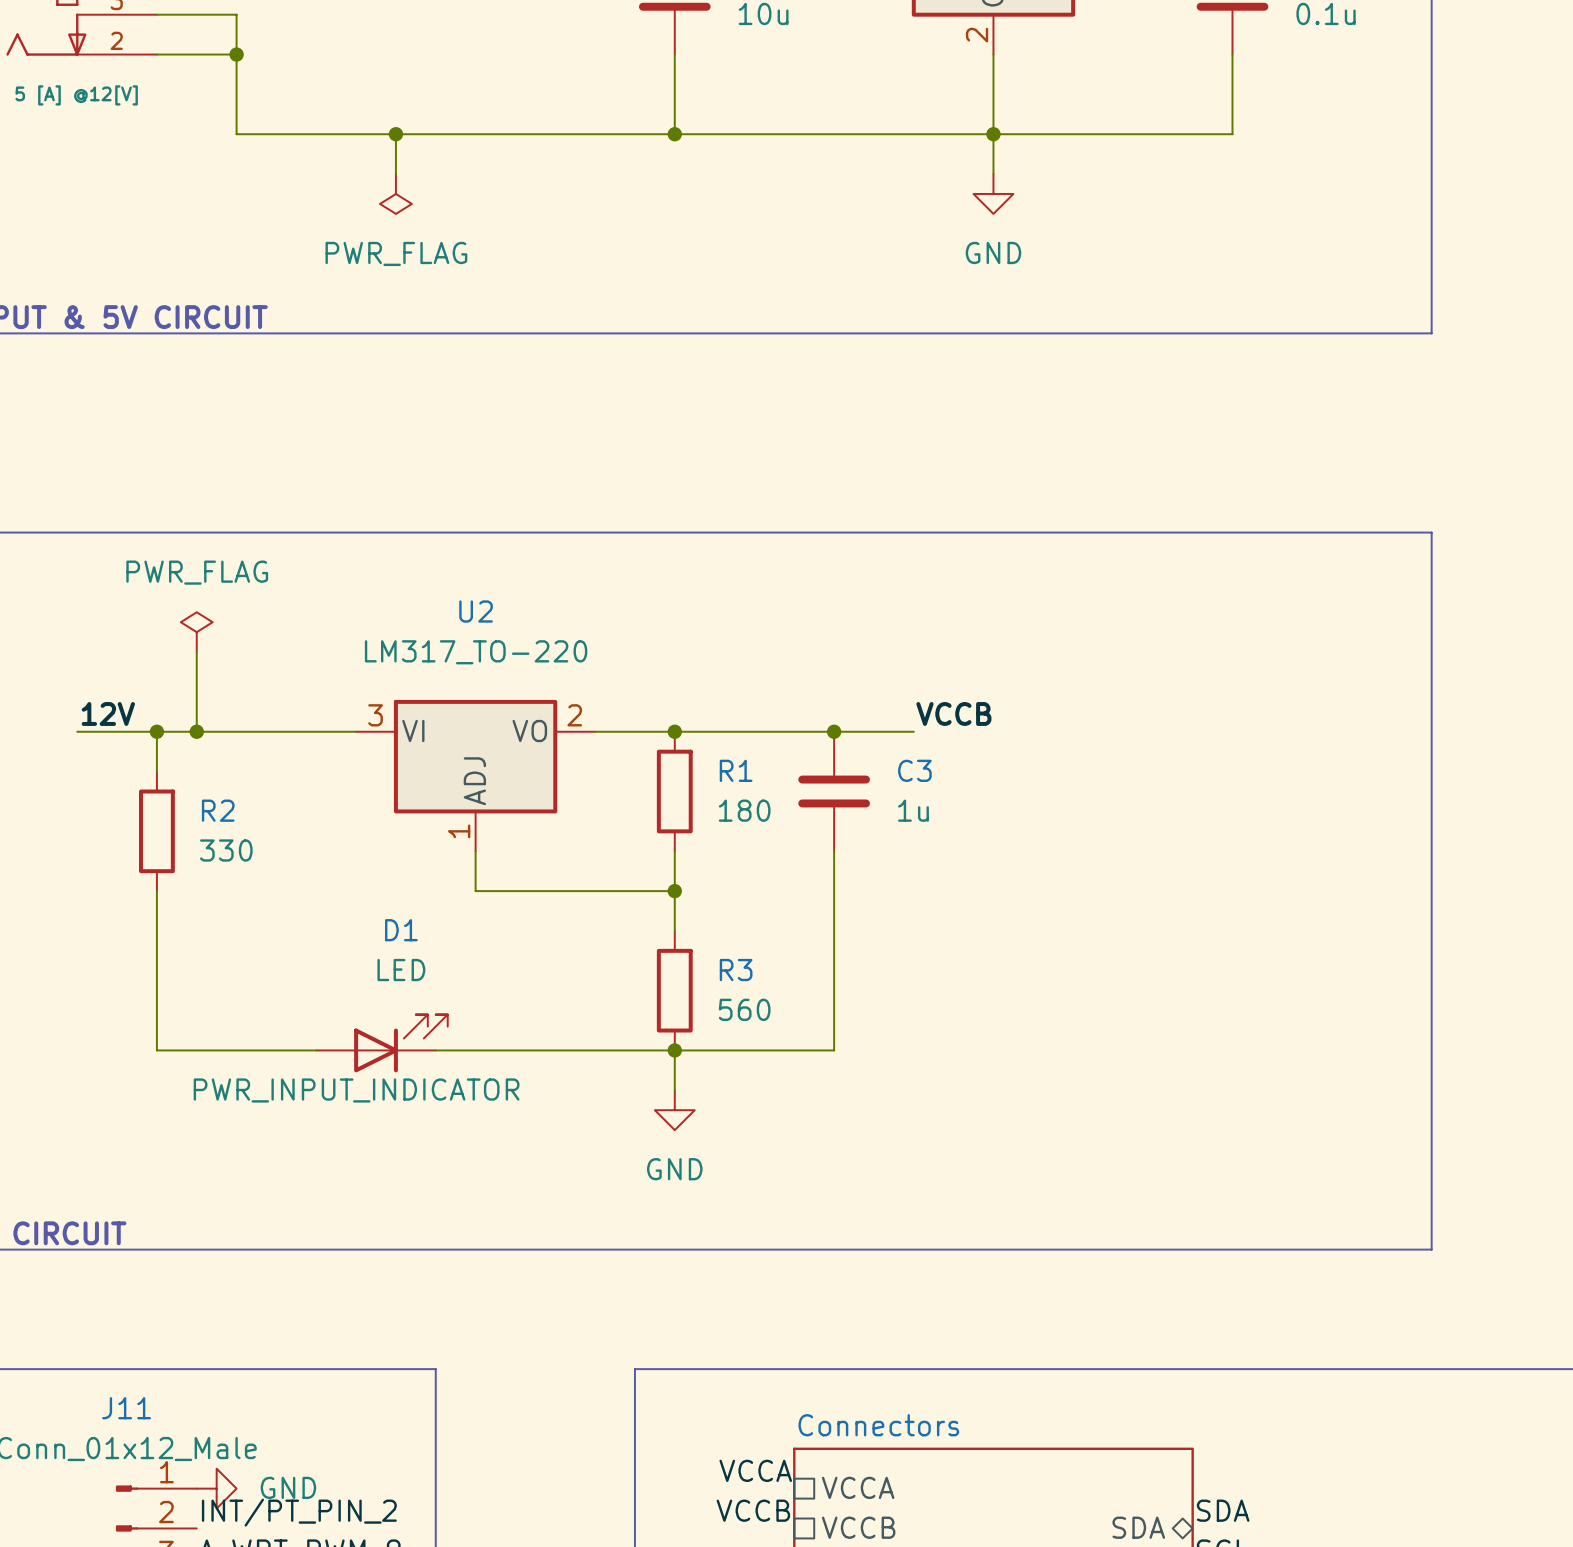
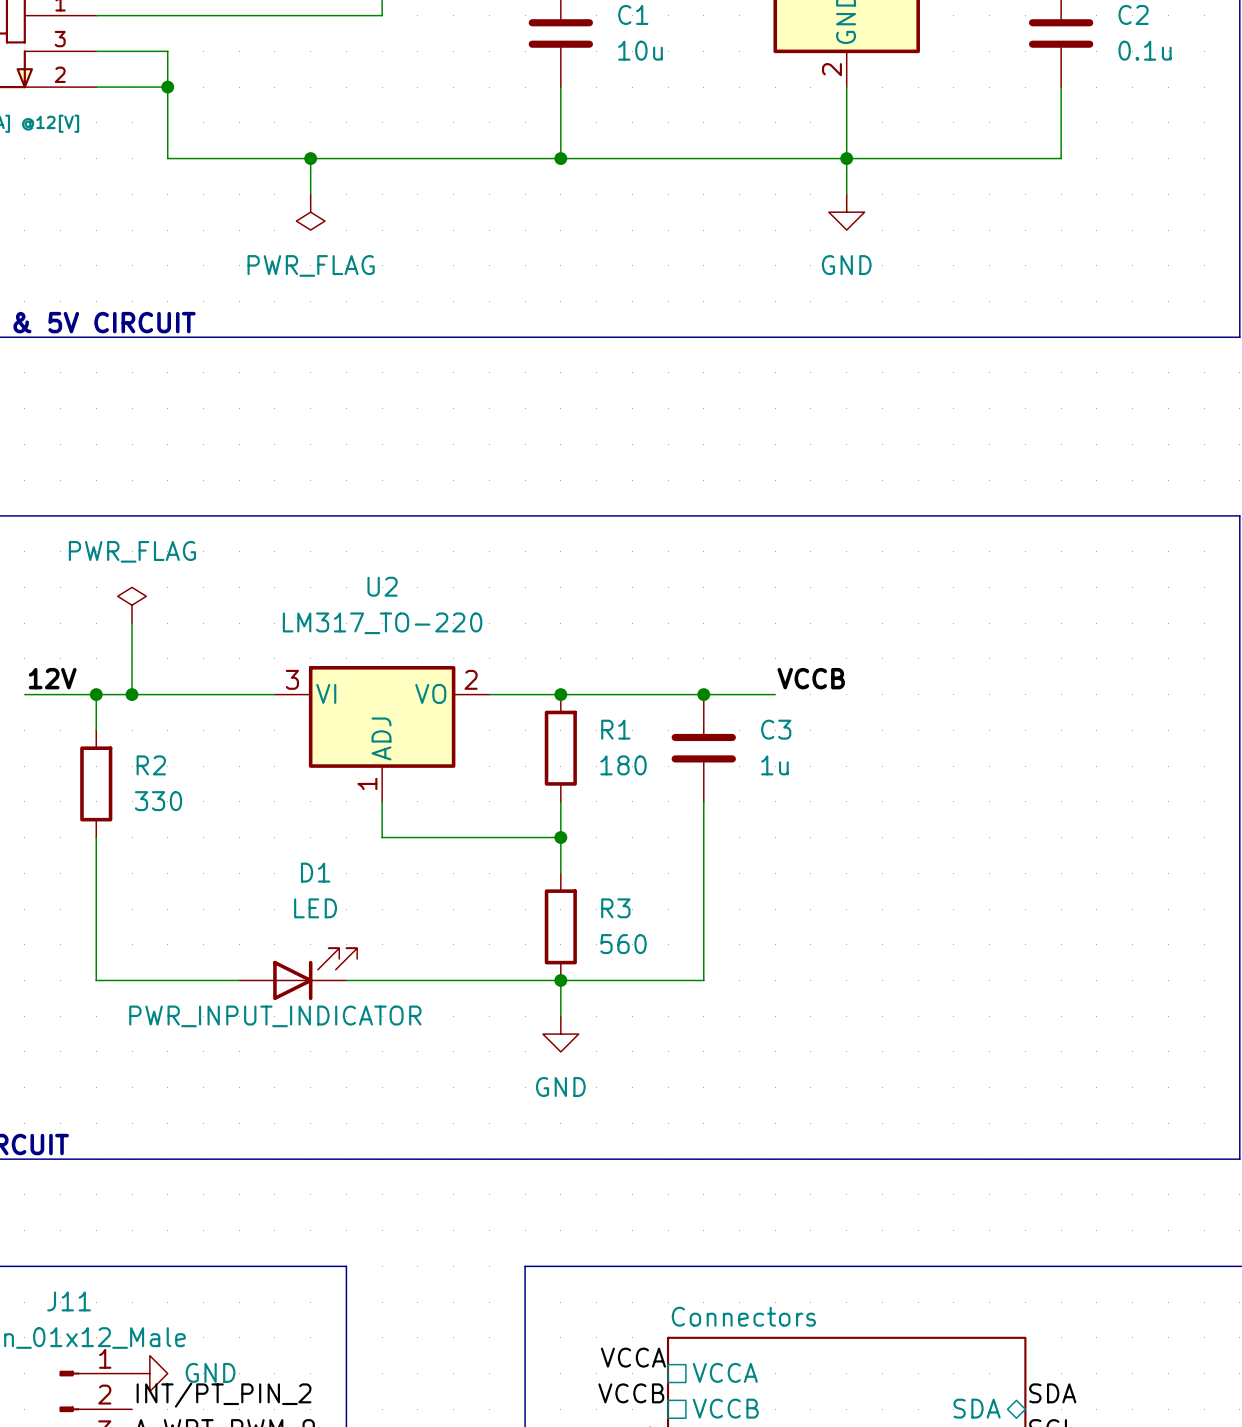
power symbol text position: GND (288, 1487) -> GND (210, 1372)

